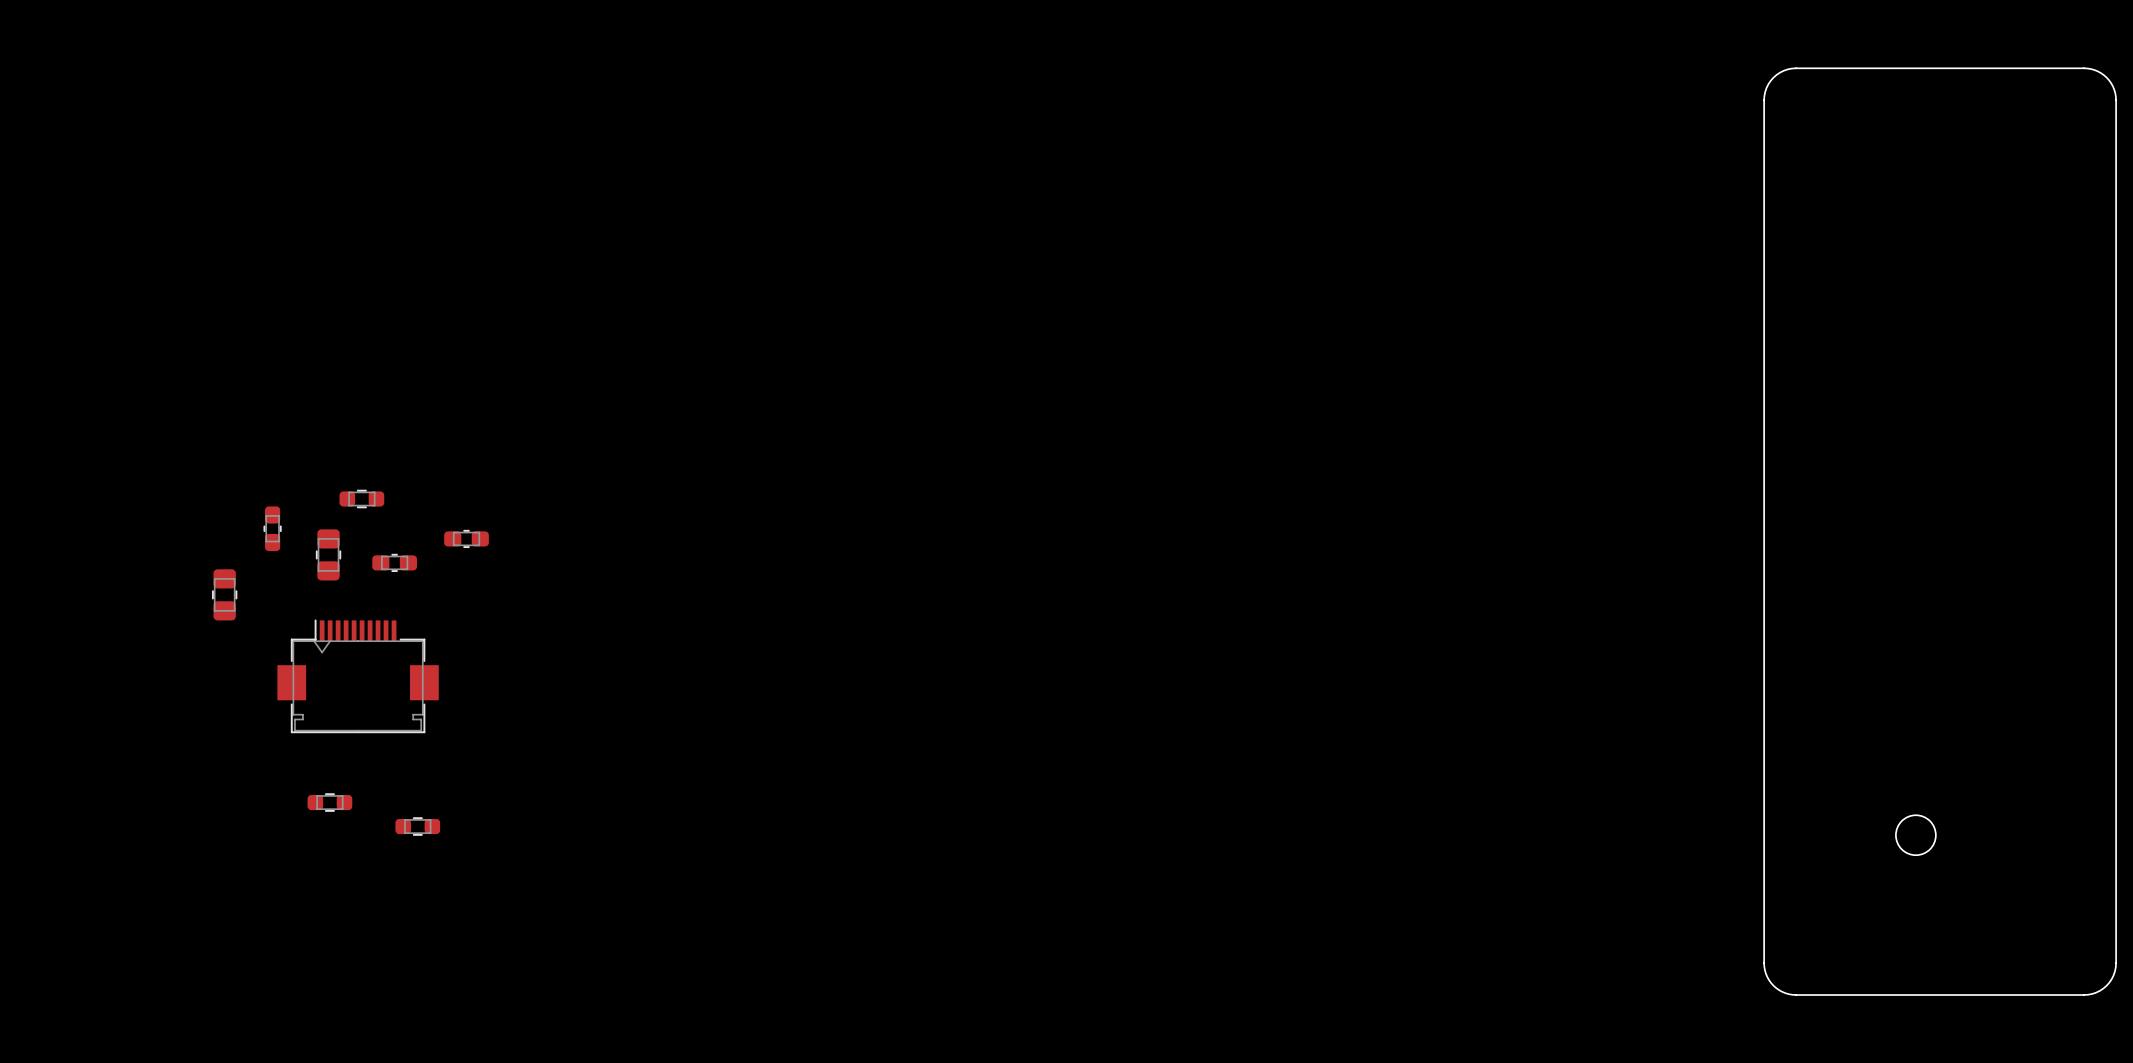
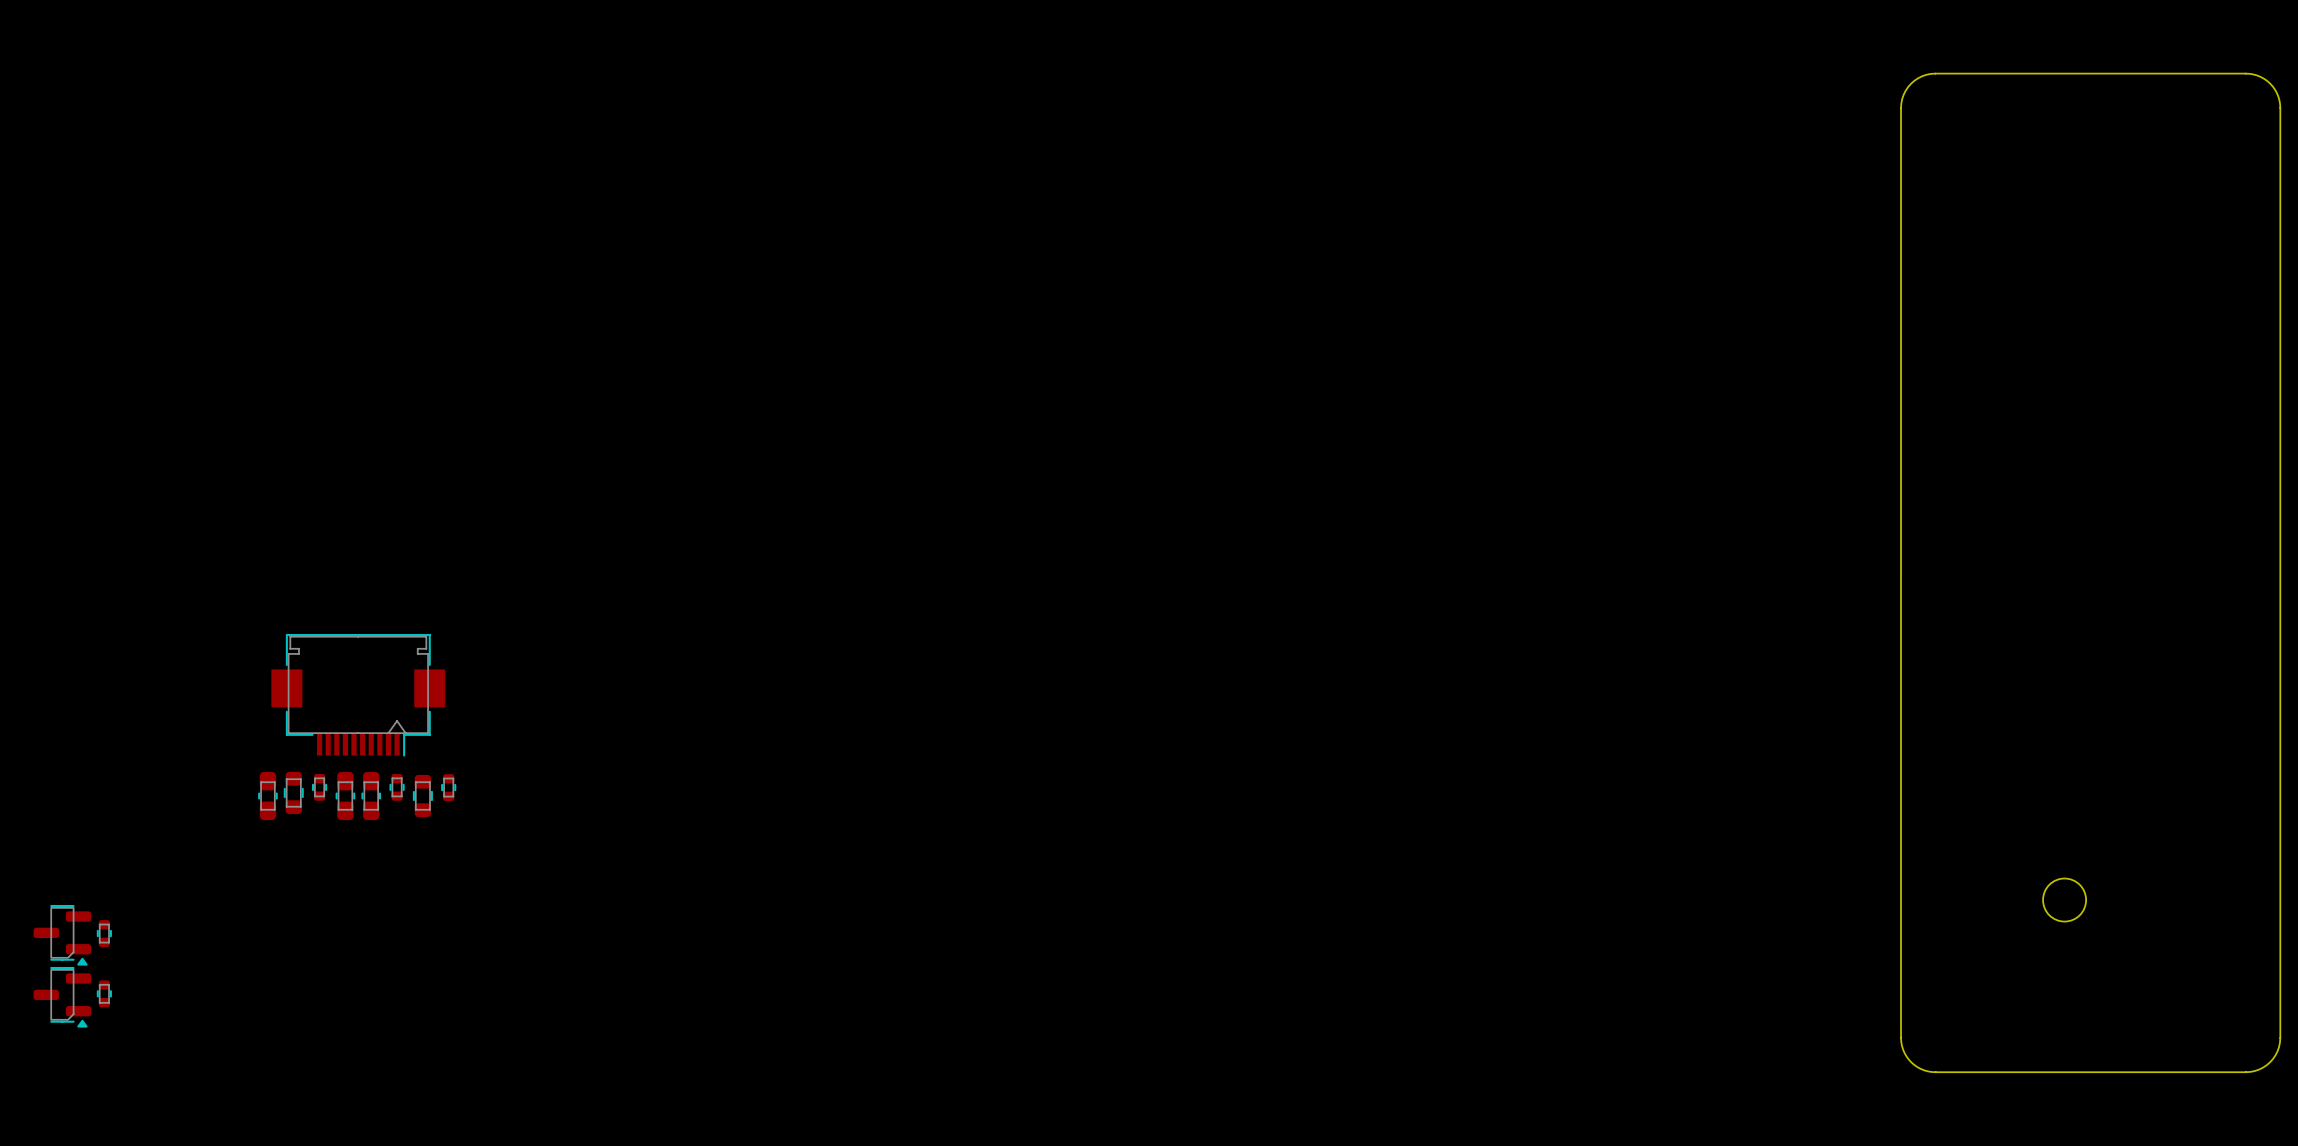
part: (361, 498) -> none
part: (272, 528) -> none
part: (466, 538) -> none
part: (328, 554) -> none
part: (394, 562) -> none
part: (224, 594) -> none
part rotation: 0° (358, 676) -> 180° (358, 695)
part: none -> (319, 787)
part: none -> (397, 787)
part: none -> (448, 787)
part: none -> (293, 792)
part: none -> (267, 795)
part: none -> (345, 795)
part: none -> (371, 795)
part: none -> (422, 795)
part: (329, 802) -> none
part: (417, 826) -> none
part: none -> (104, 933)
part: none -> (62, 935)
part: none -> (104, 993)
part: none -> (62, 997)

